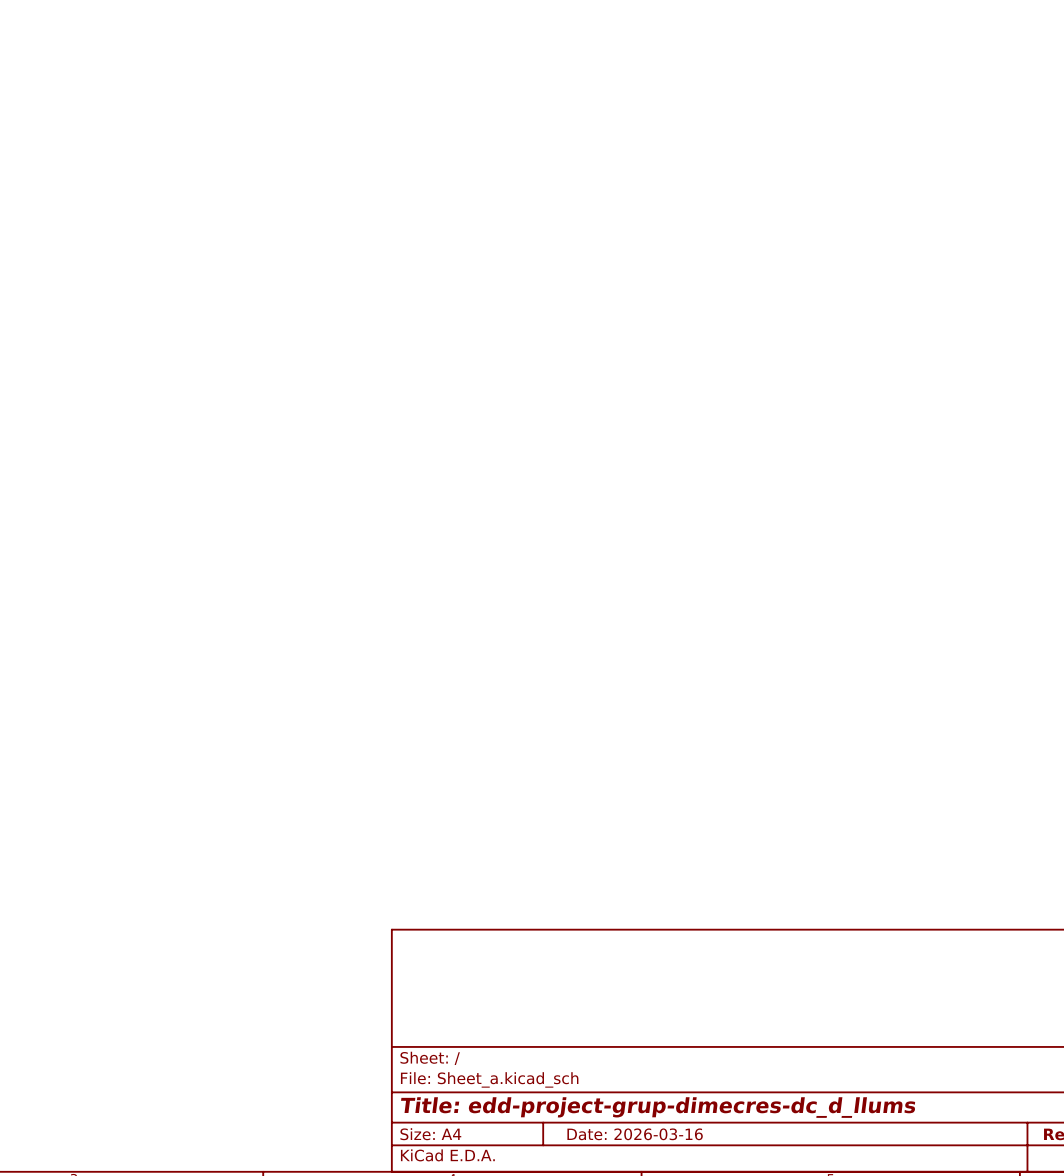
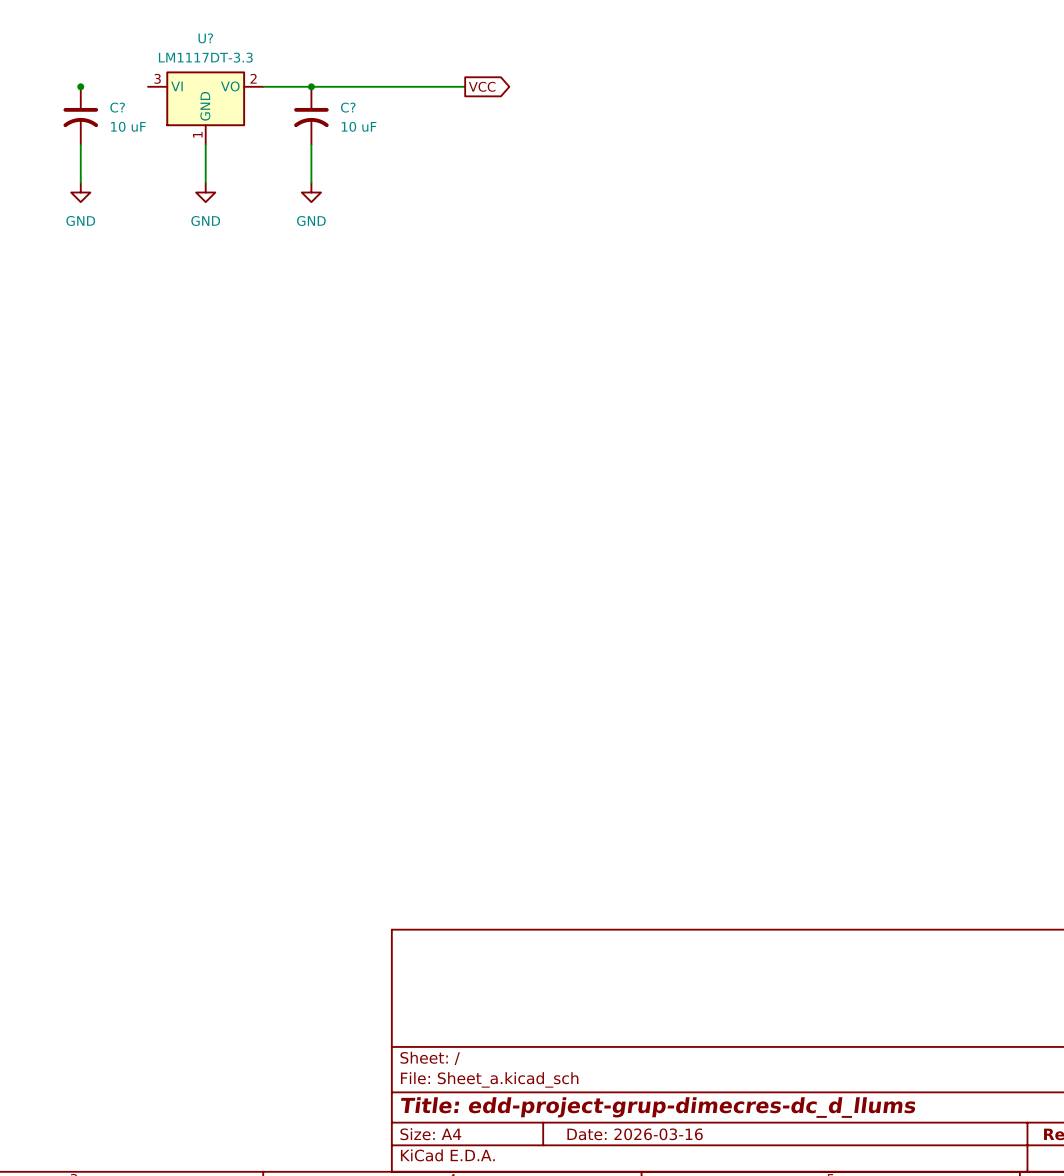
junction: none -> (80, 86)
wire: none -> (263, 86) (465, 86)
junction: none -> (311, 86)
global label: none -> VCC (482, 86)
U?: none -> LM1117DT-3.3 (205, 107)
C?: none -> 10 uF (80, 115)
C?: none -> 10 uF (311, 115)
wire: none -> (80, 144) (80, 182)
wire: none -> (205, 144) (205, 182)
wire: none -> (311, 144) (311, 182)
power symbol: none -> GND (80, 192)
power symbol: none -> GND (205, 192)
power symbol: none -> GND (311, 192)

